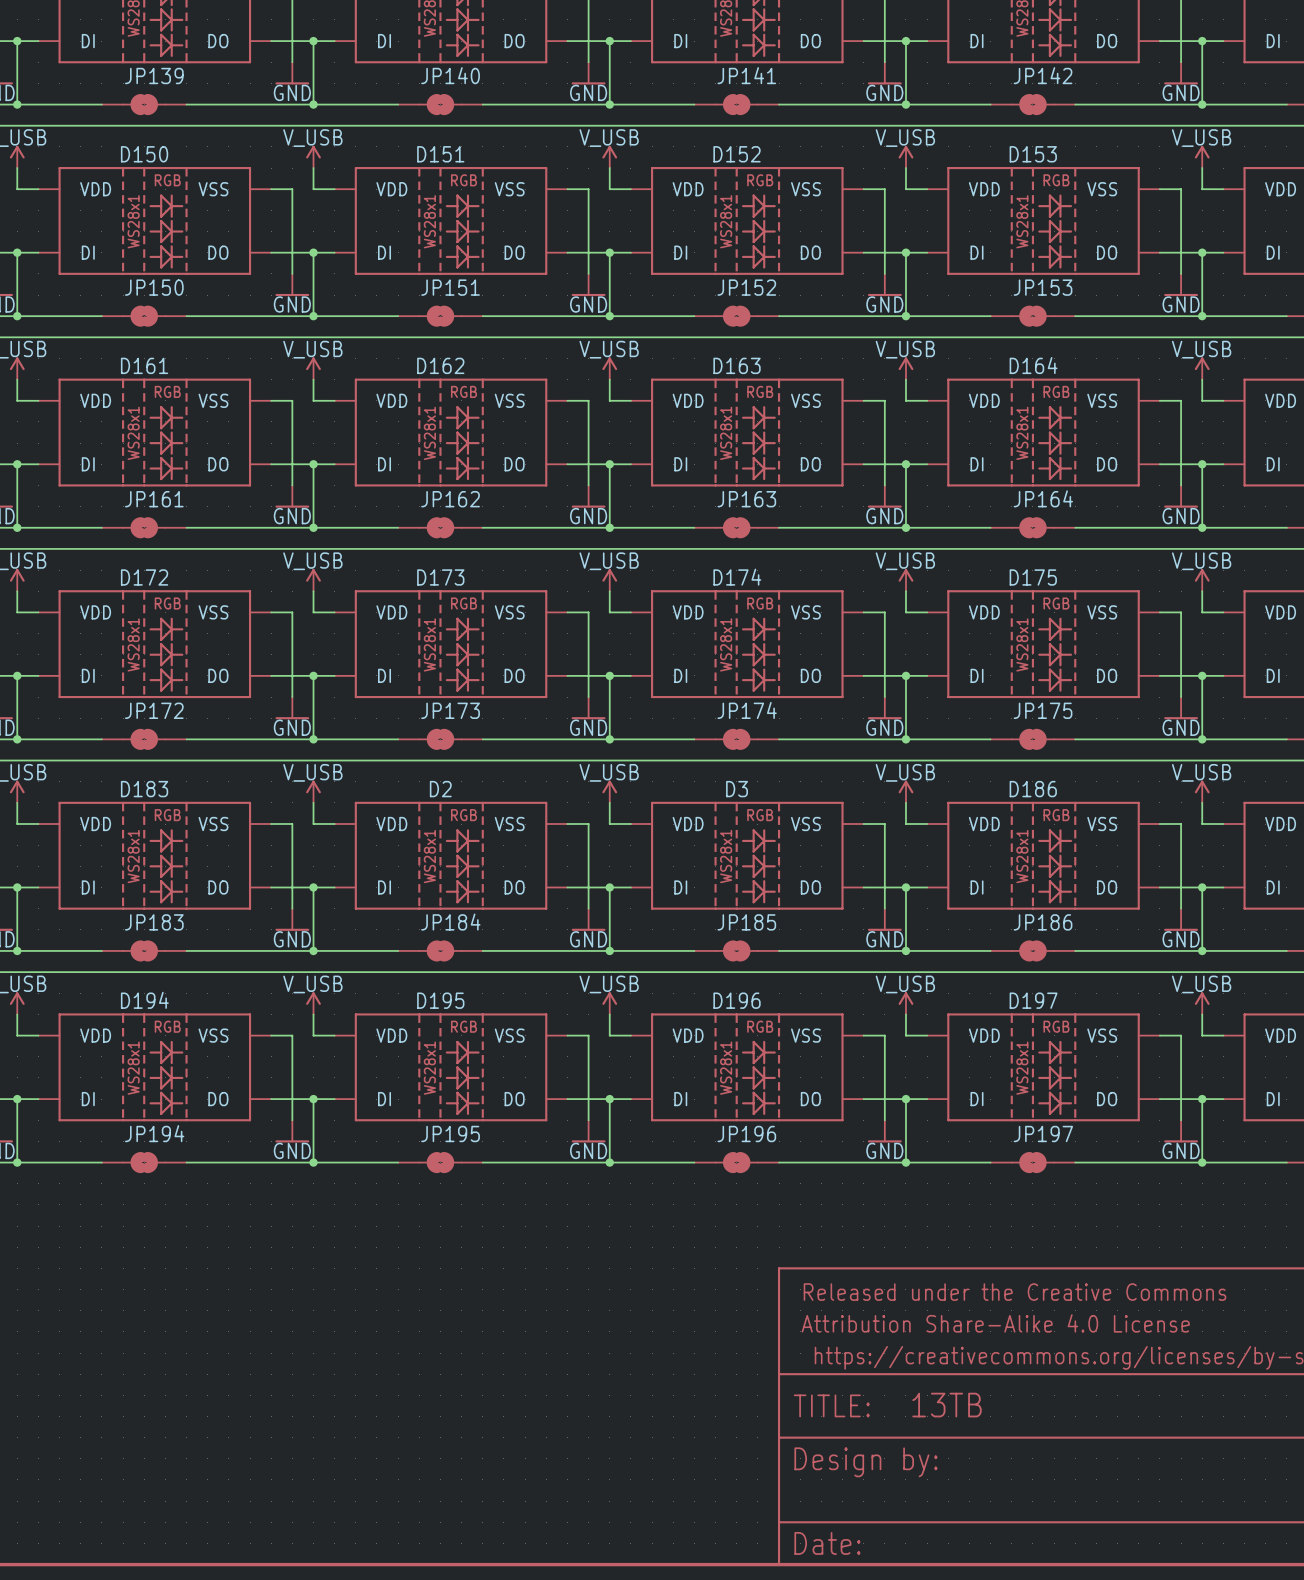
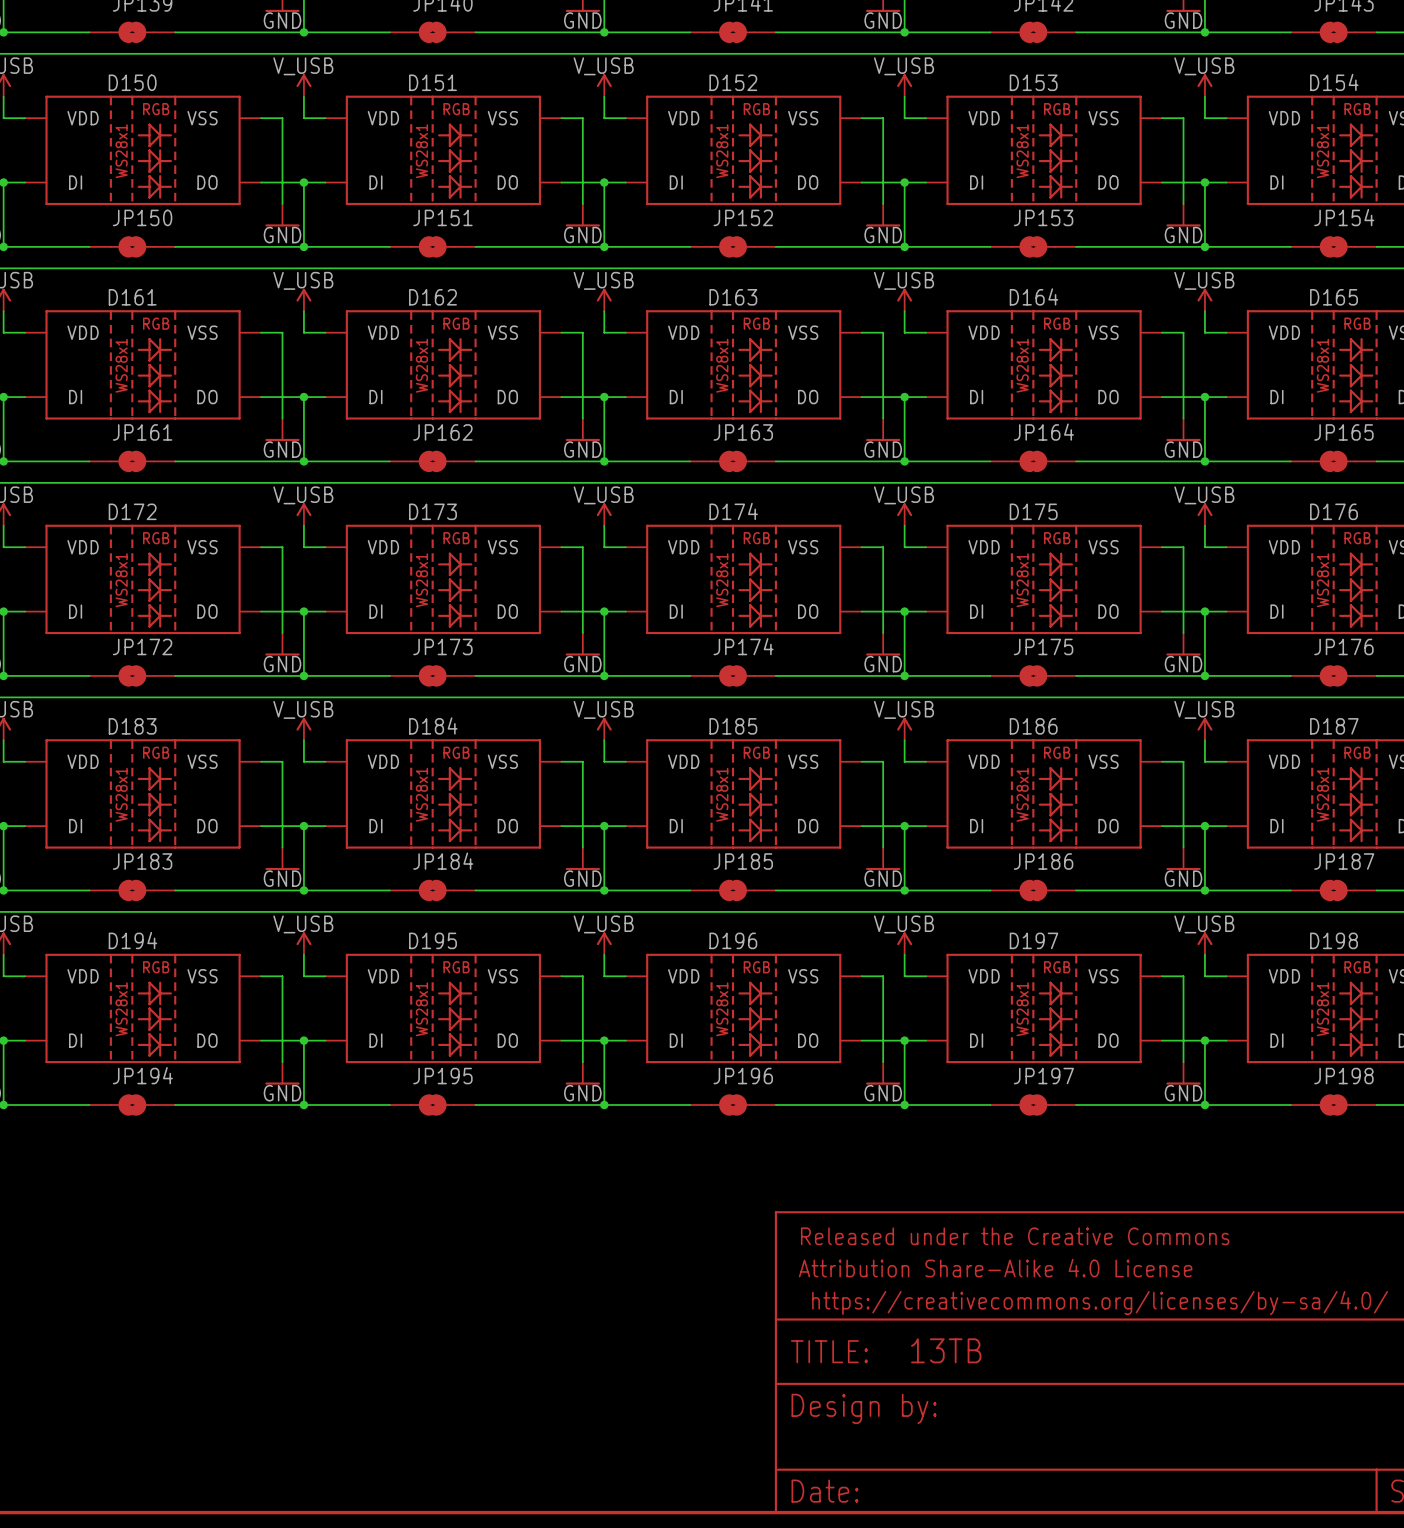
D2 name: D2 (440, 789) -> D184 (433, 726)
D3 name: D3 (737, 789) -> D185 (733, 726)

